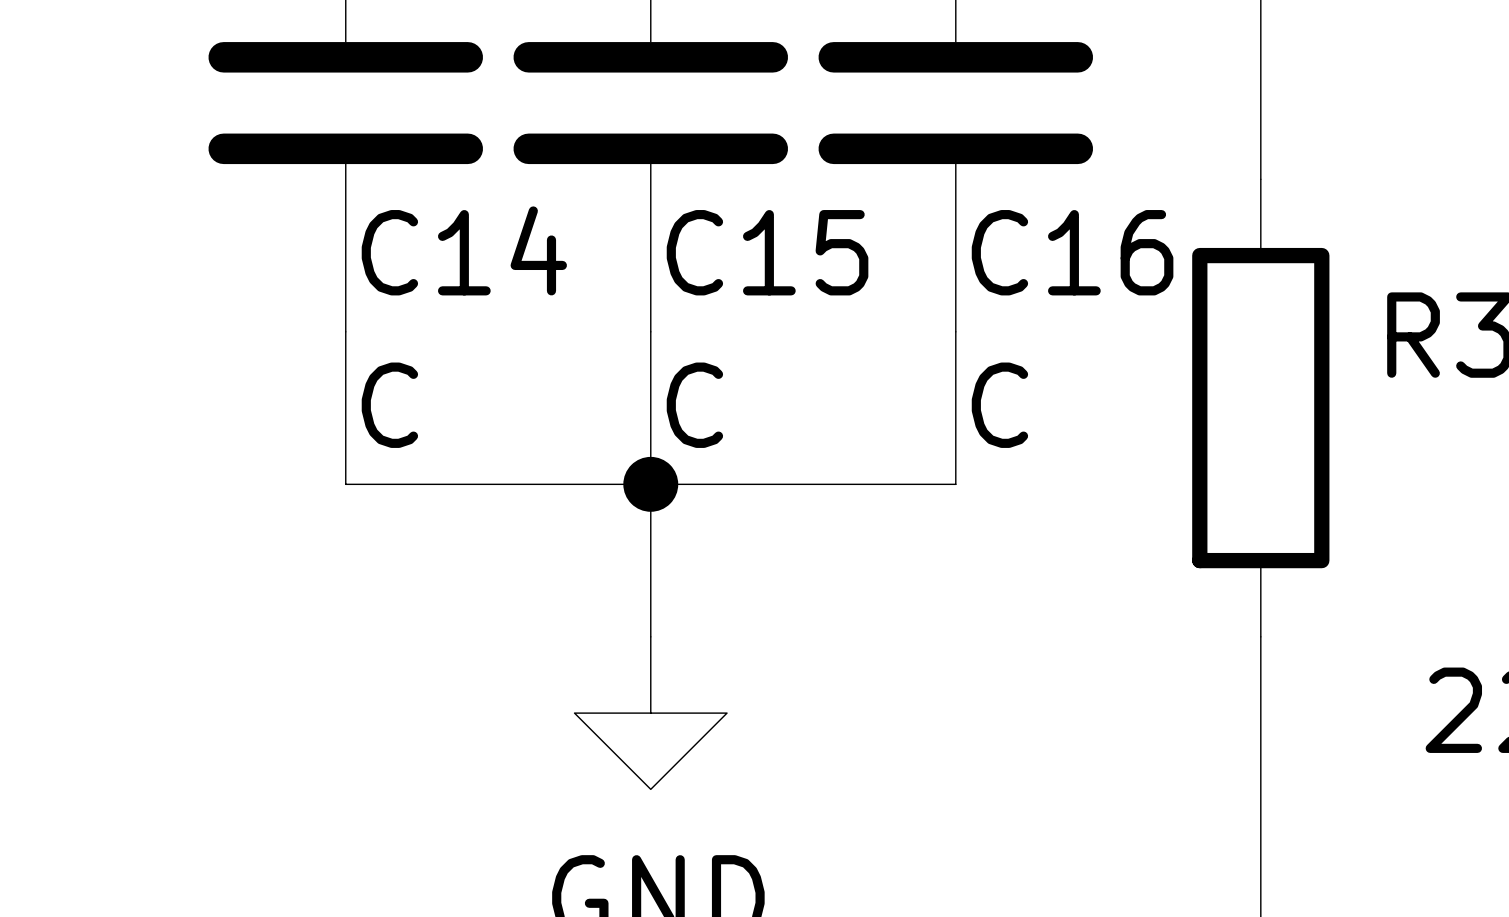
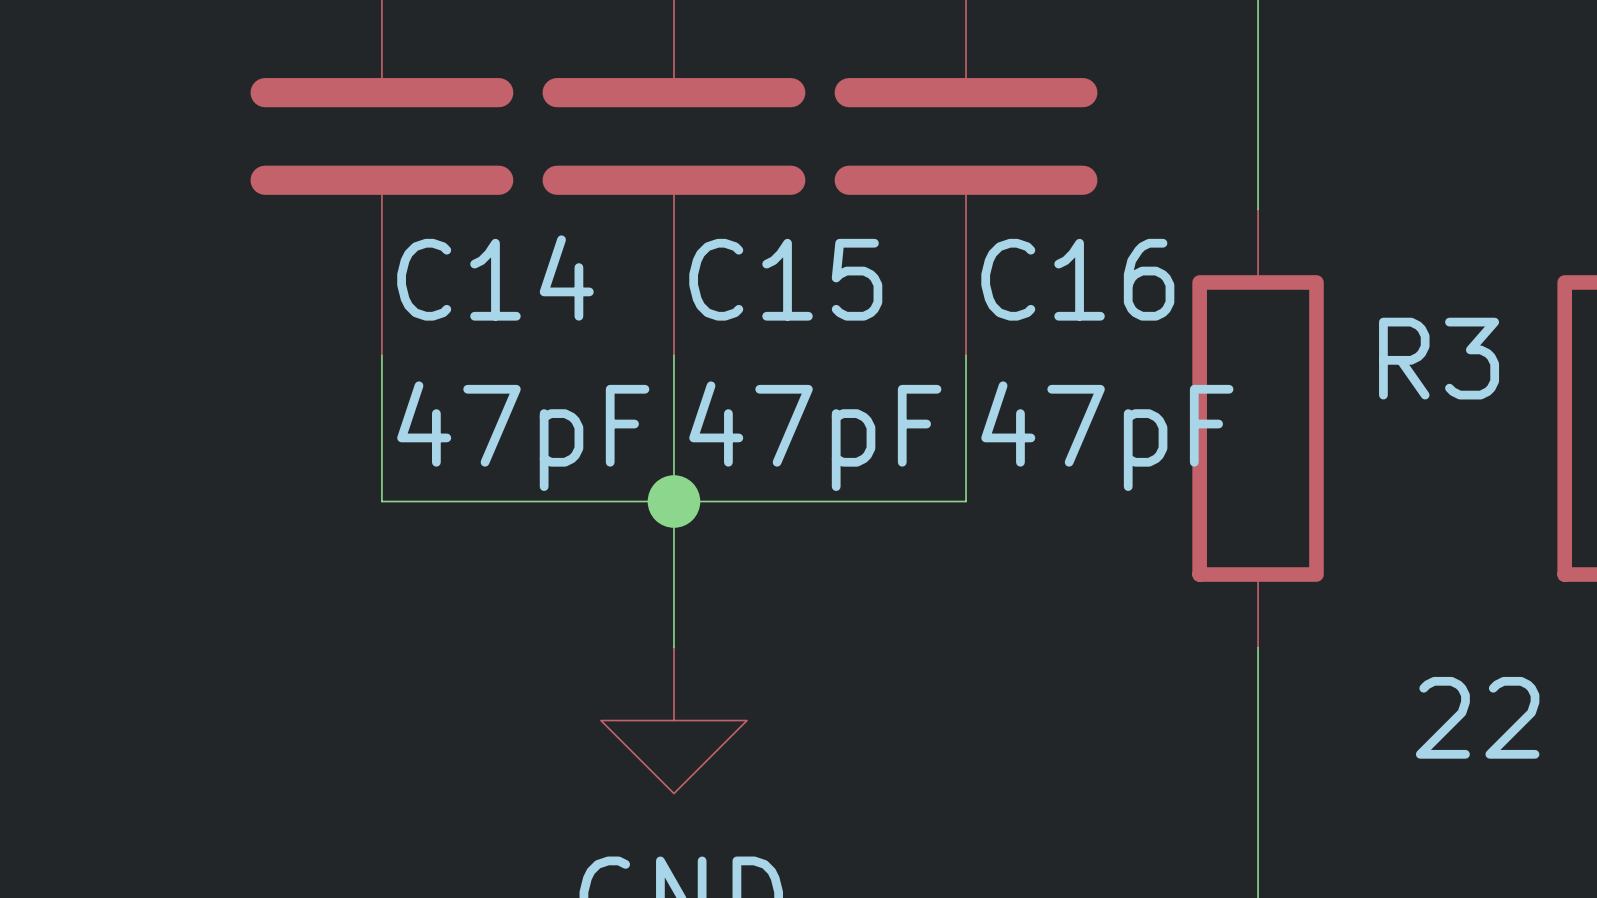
C14 value: C (389, 405) -> 47pF (523, 436)
C15 value: C (694, 405) -> 47pF (815, 436)
C16 value: C (999, 405) -> 47pF (1107, 436)

